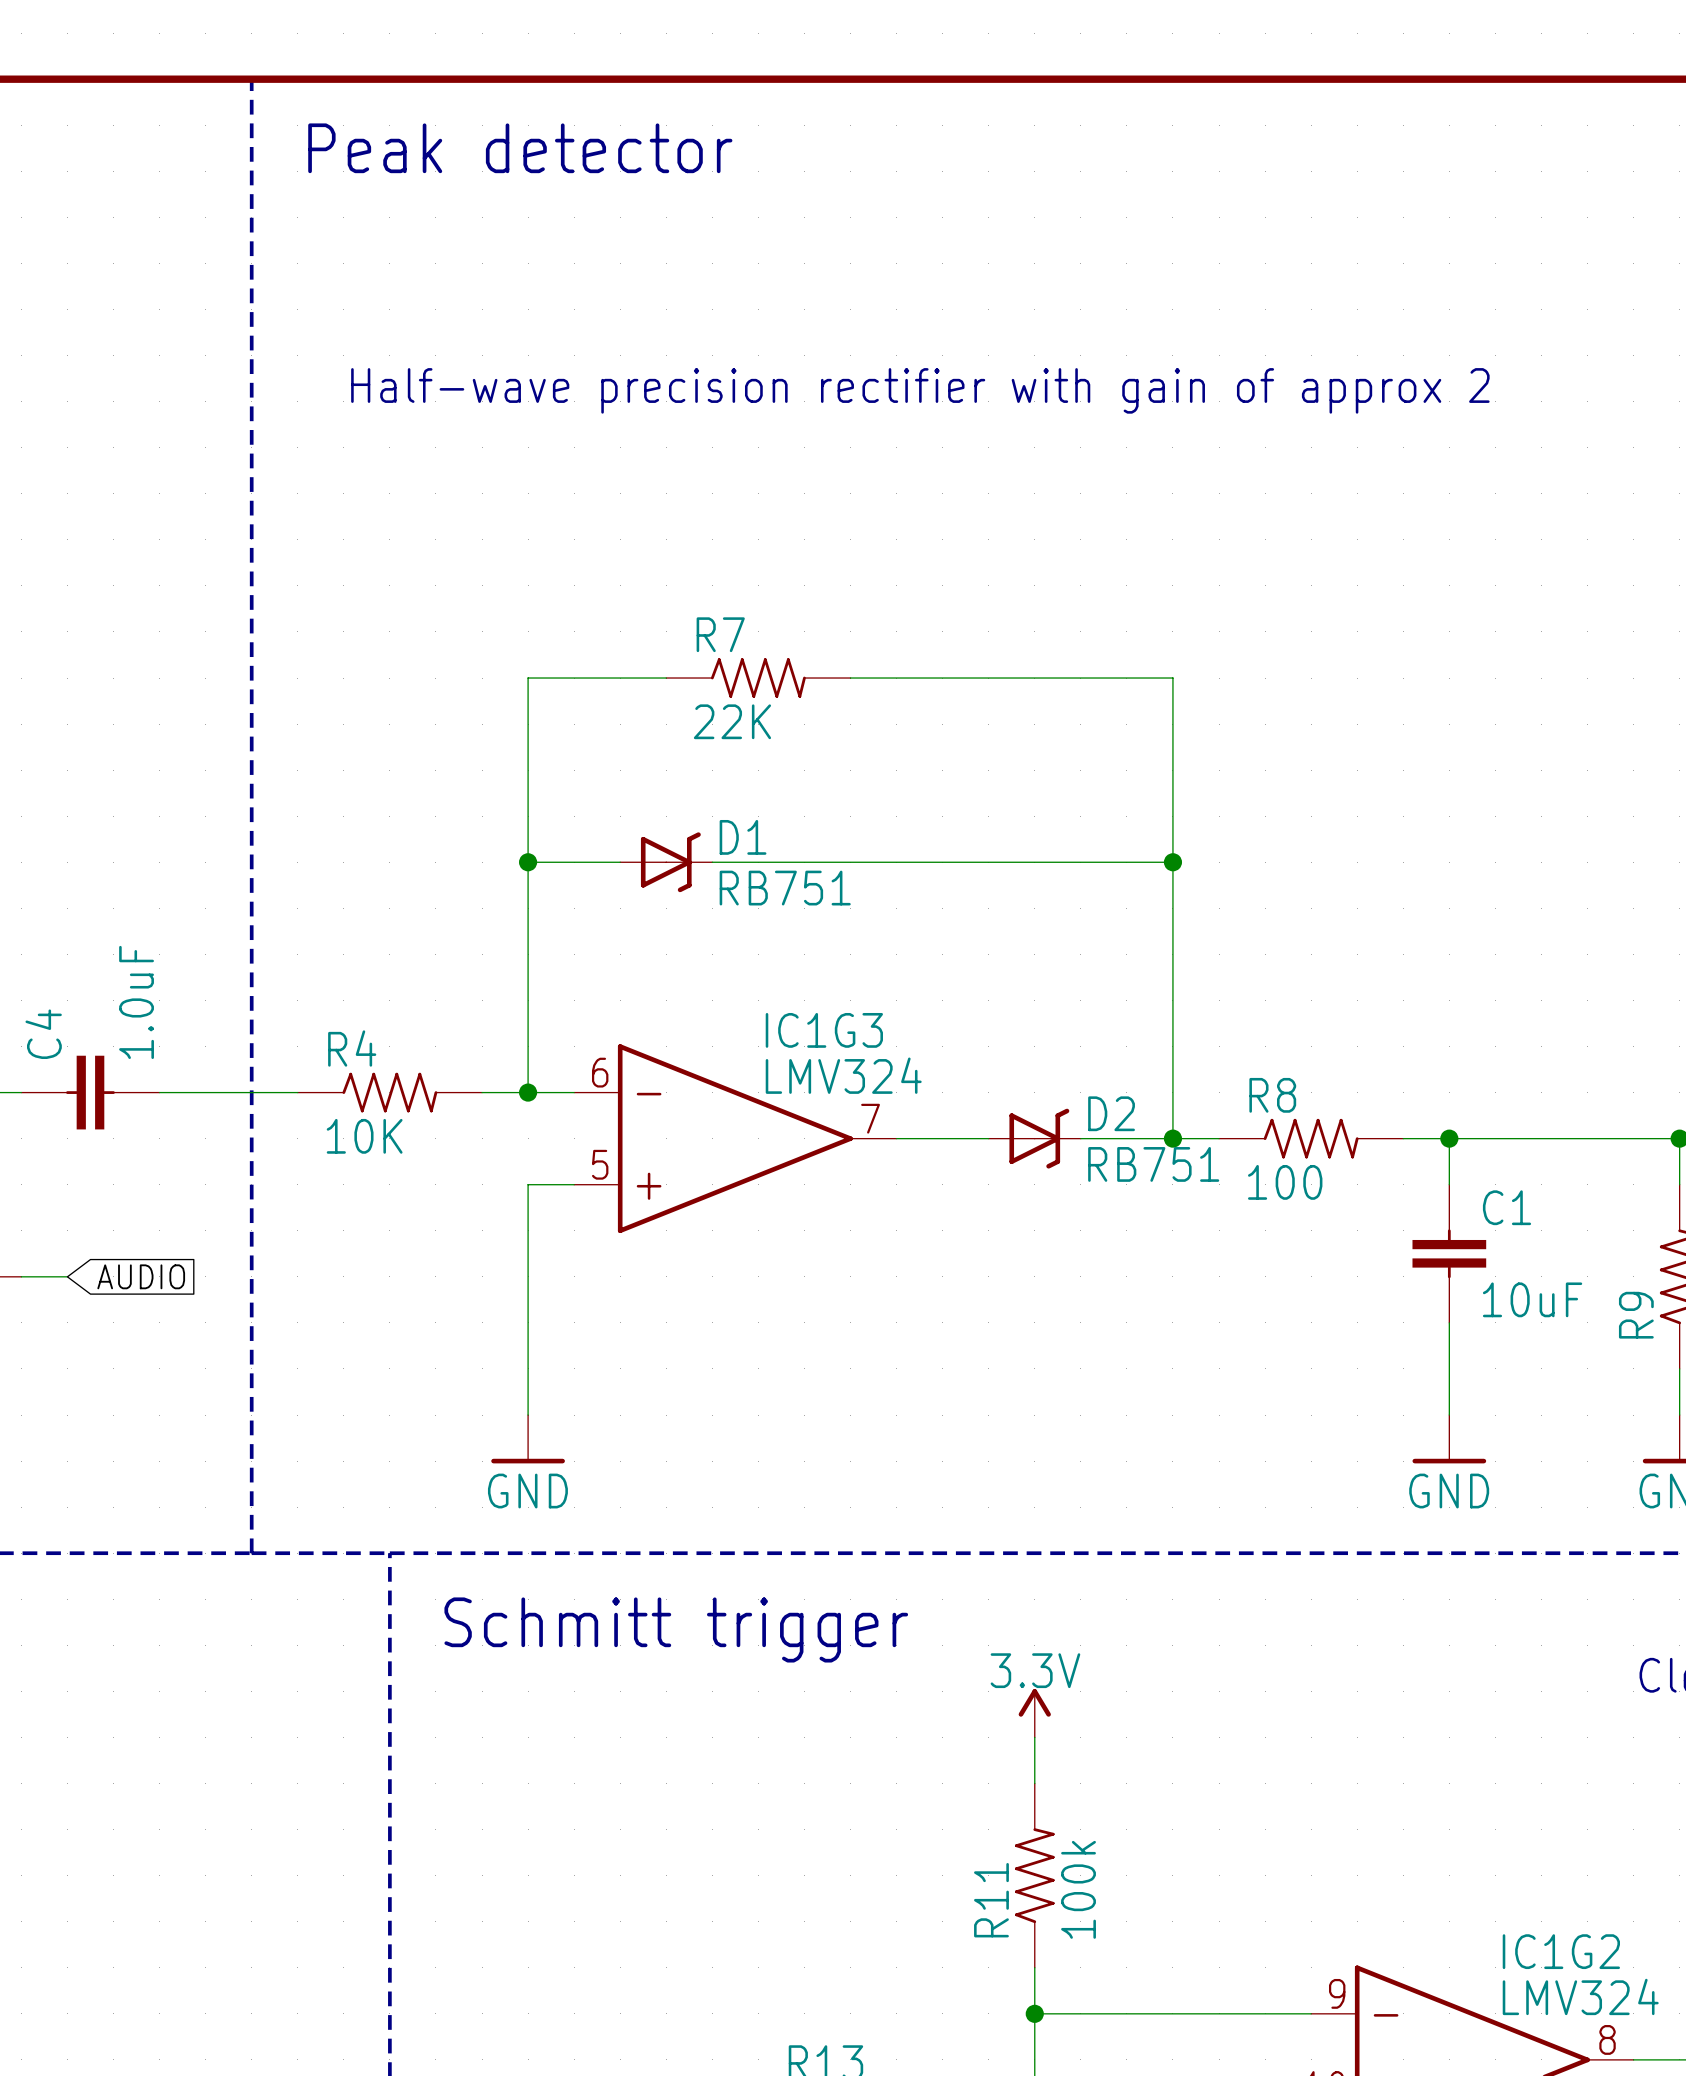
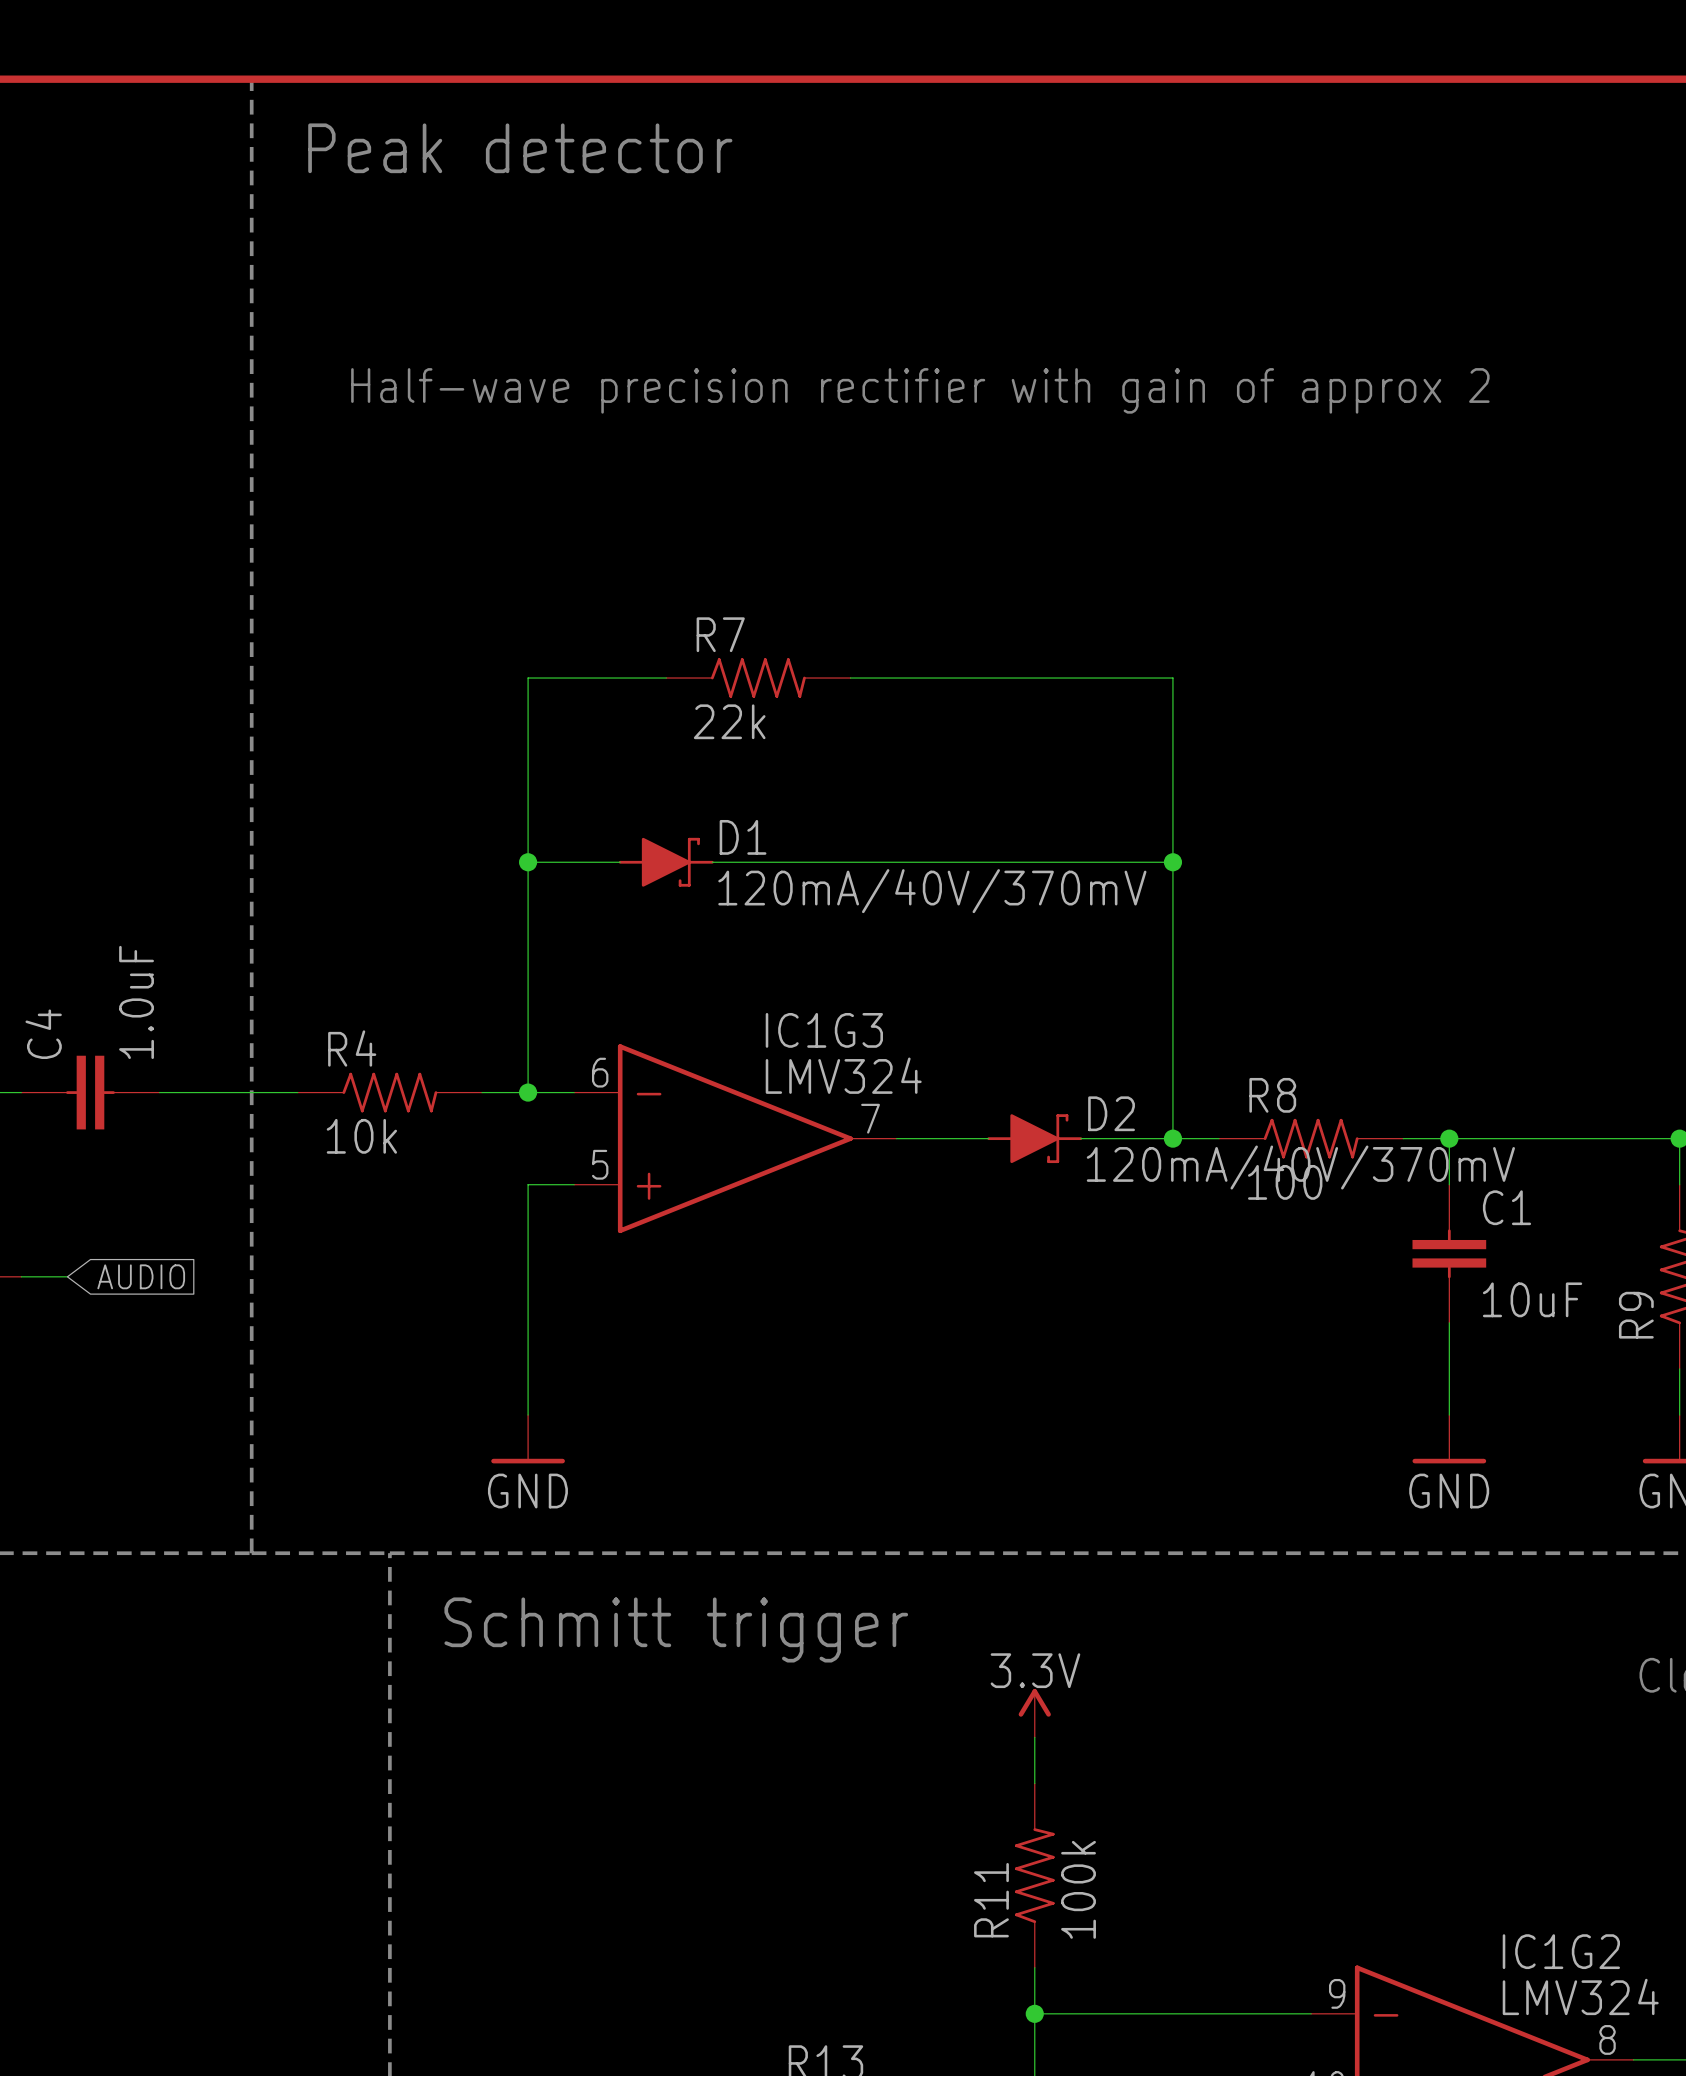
R7 value: 22K (732, 721) -> 22k (729, 721)
D1 symbol: [620, 832, 713, 893] -> [618, 837, 714, 887]
D1 value: RB751 (785, 888) -> 120mA/40V/370mV (932, 891)
D2 symbol: [988, 1108, 1081, 1169] -> [987, 1114, 1083, 1164]
R4 value: 10K (364, 1136) -> 10k (361, 1136)
D2 value: RB751 (1153, 1164) -> 120mA/40V/370mV (1300, 1167)

